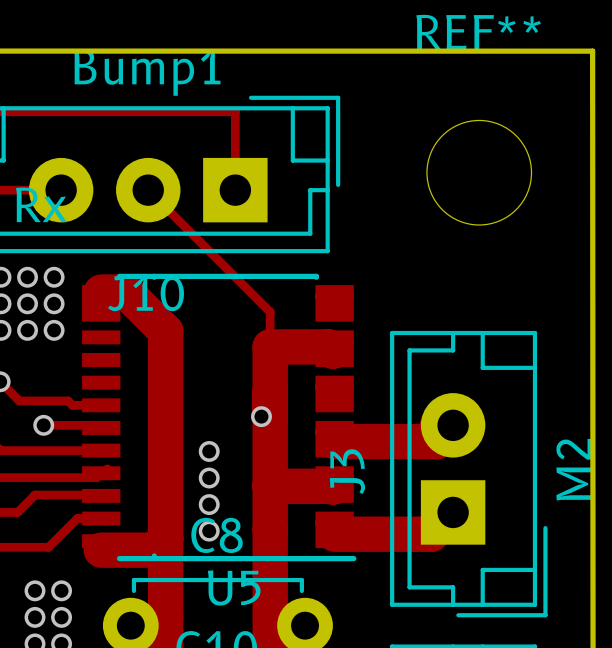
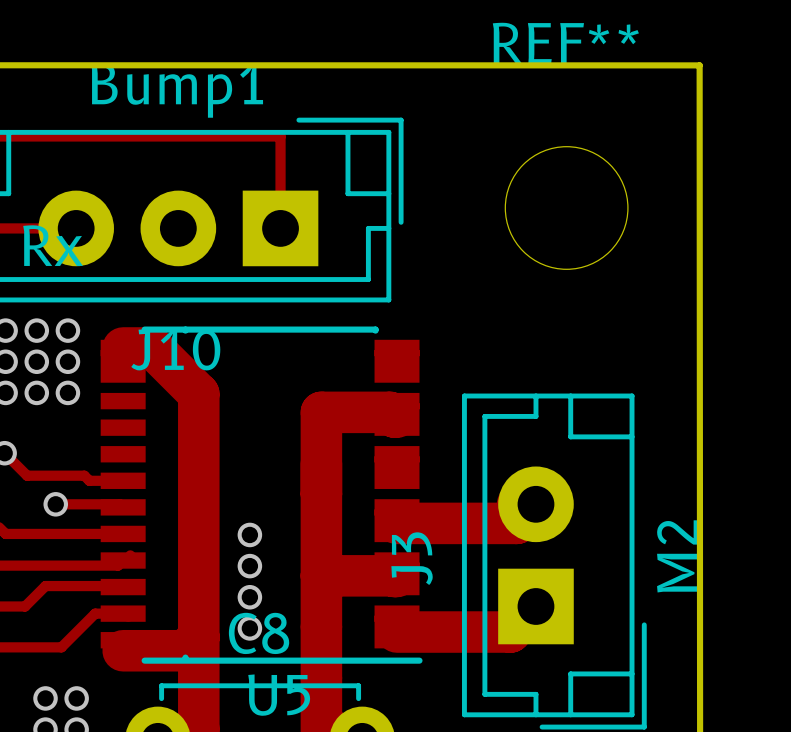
track: (148, 190) (270, 312) (270, 346) -> none
via: (261, 416) -> none

